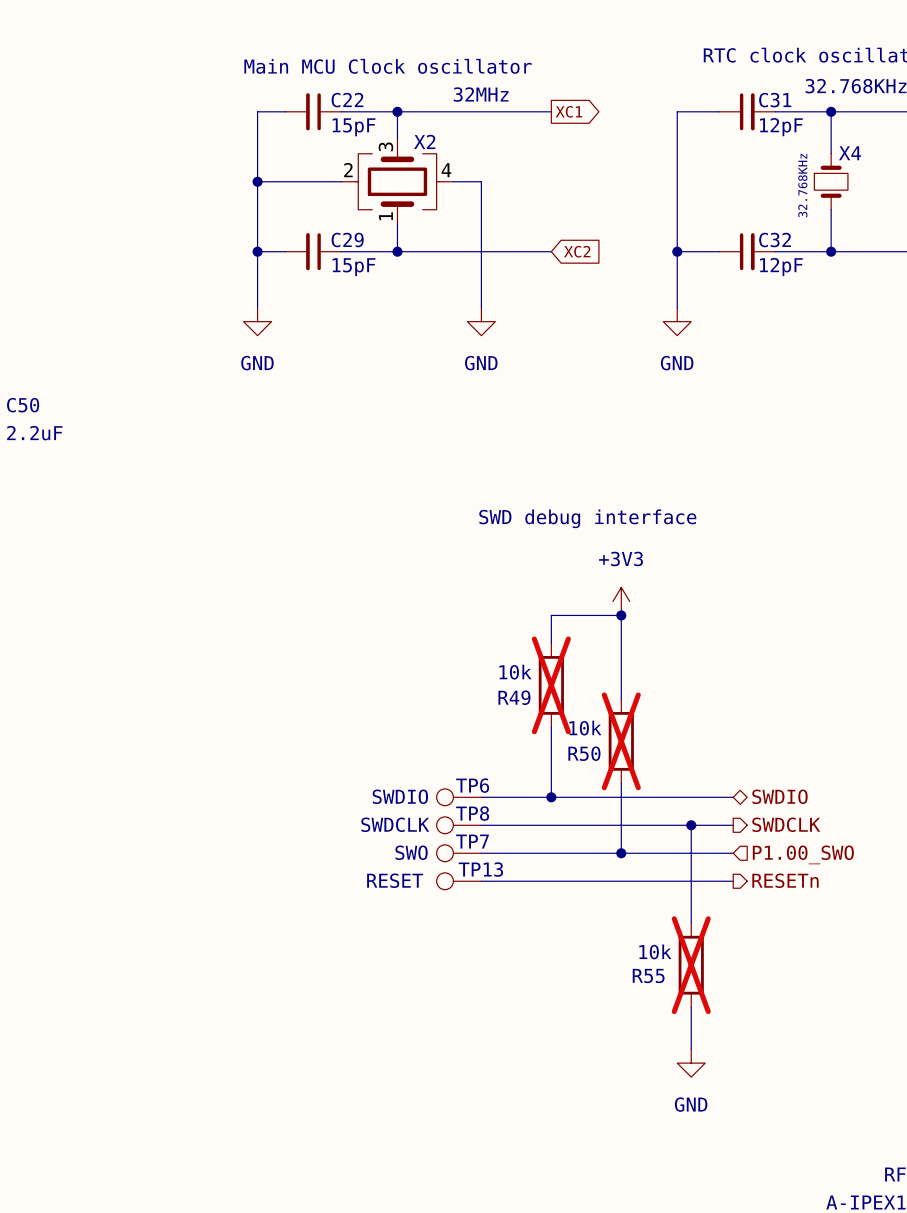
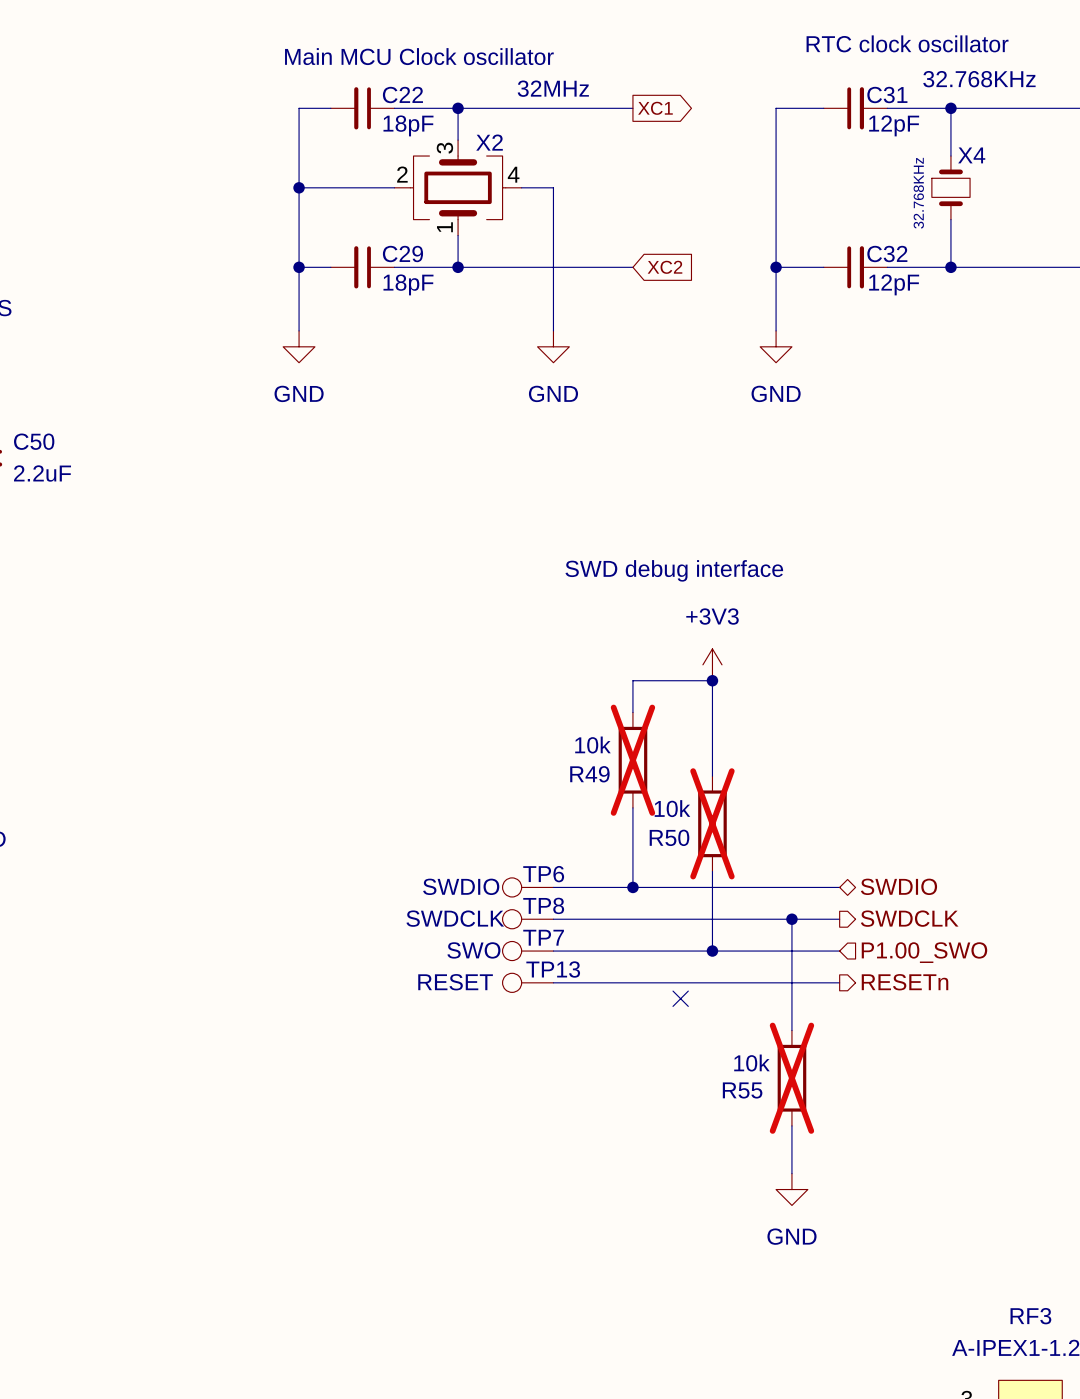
C22 value: 15pF (354, 127) -> 18pF (408, 125)
C29 value: 15pF (354, 267) -> 18pF (408, 284)
no-connect mark: none -> (680, 998)

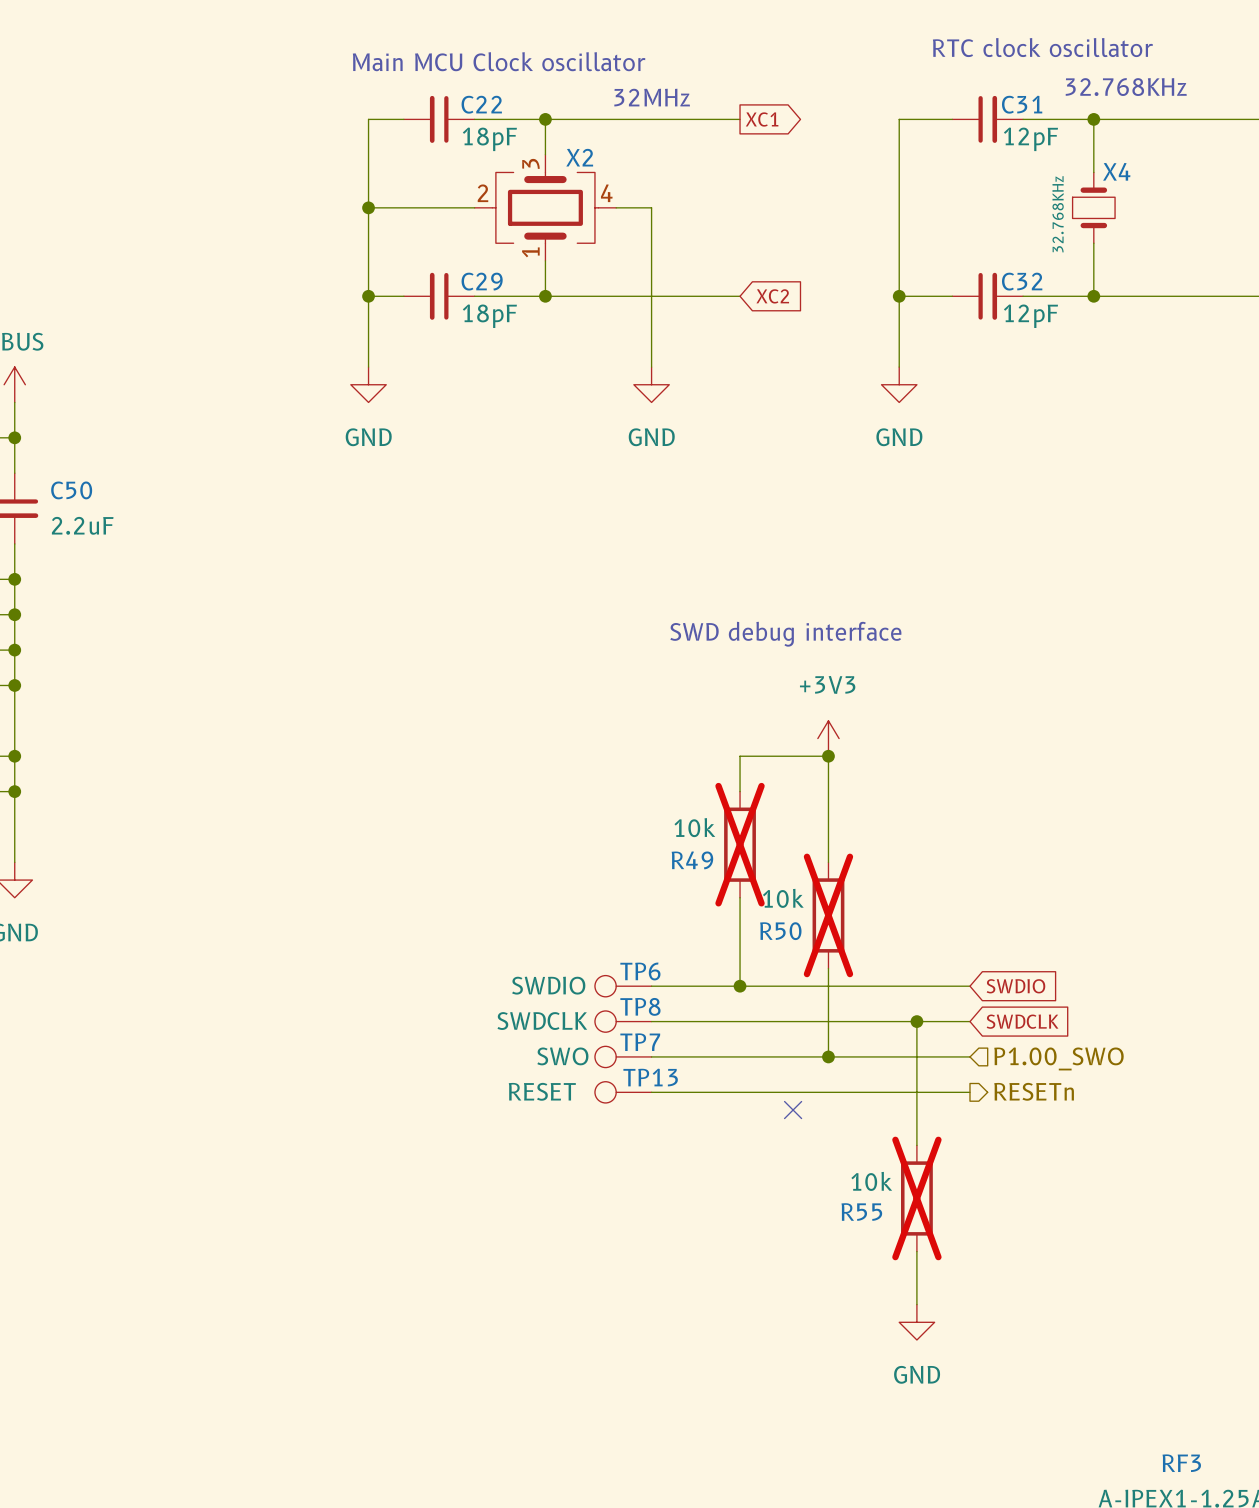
hierarchical label: SWDIO (898, 886) -> none
global label: none -> SWDIO (1015, 986)
hierarchical label: SWDCLK (909, 918) -> none
global label: none -> SWDCLK (1022, 1021)

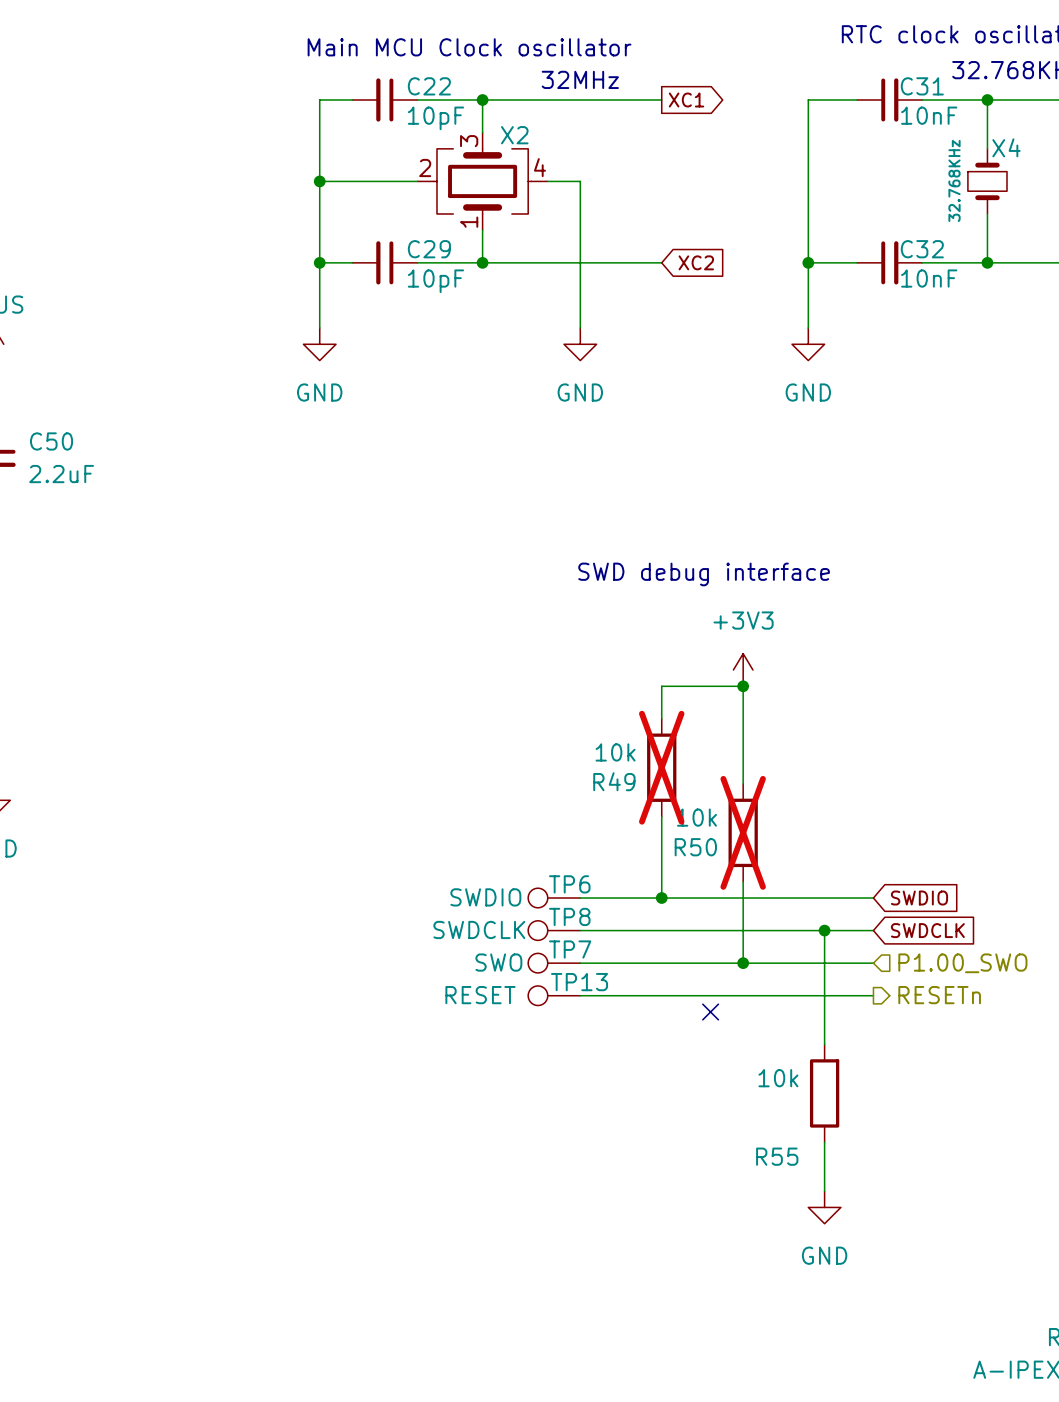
C22 value: 18pF (489, 139) -> 10pF (435, 118)
C31 value: 12pF (1030, 139) -> 10nF (929, 115)
C29 value: 18pF (489, 316) -> 10pF (435, 281)
C32 value: 12pF (1030, 316) -> 10nF (929, 278)
R55 do-not-place cross: (916, 1198) -> none
R55 name position: R55 (861, 1212) -> R55 (777, 1156)

